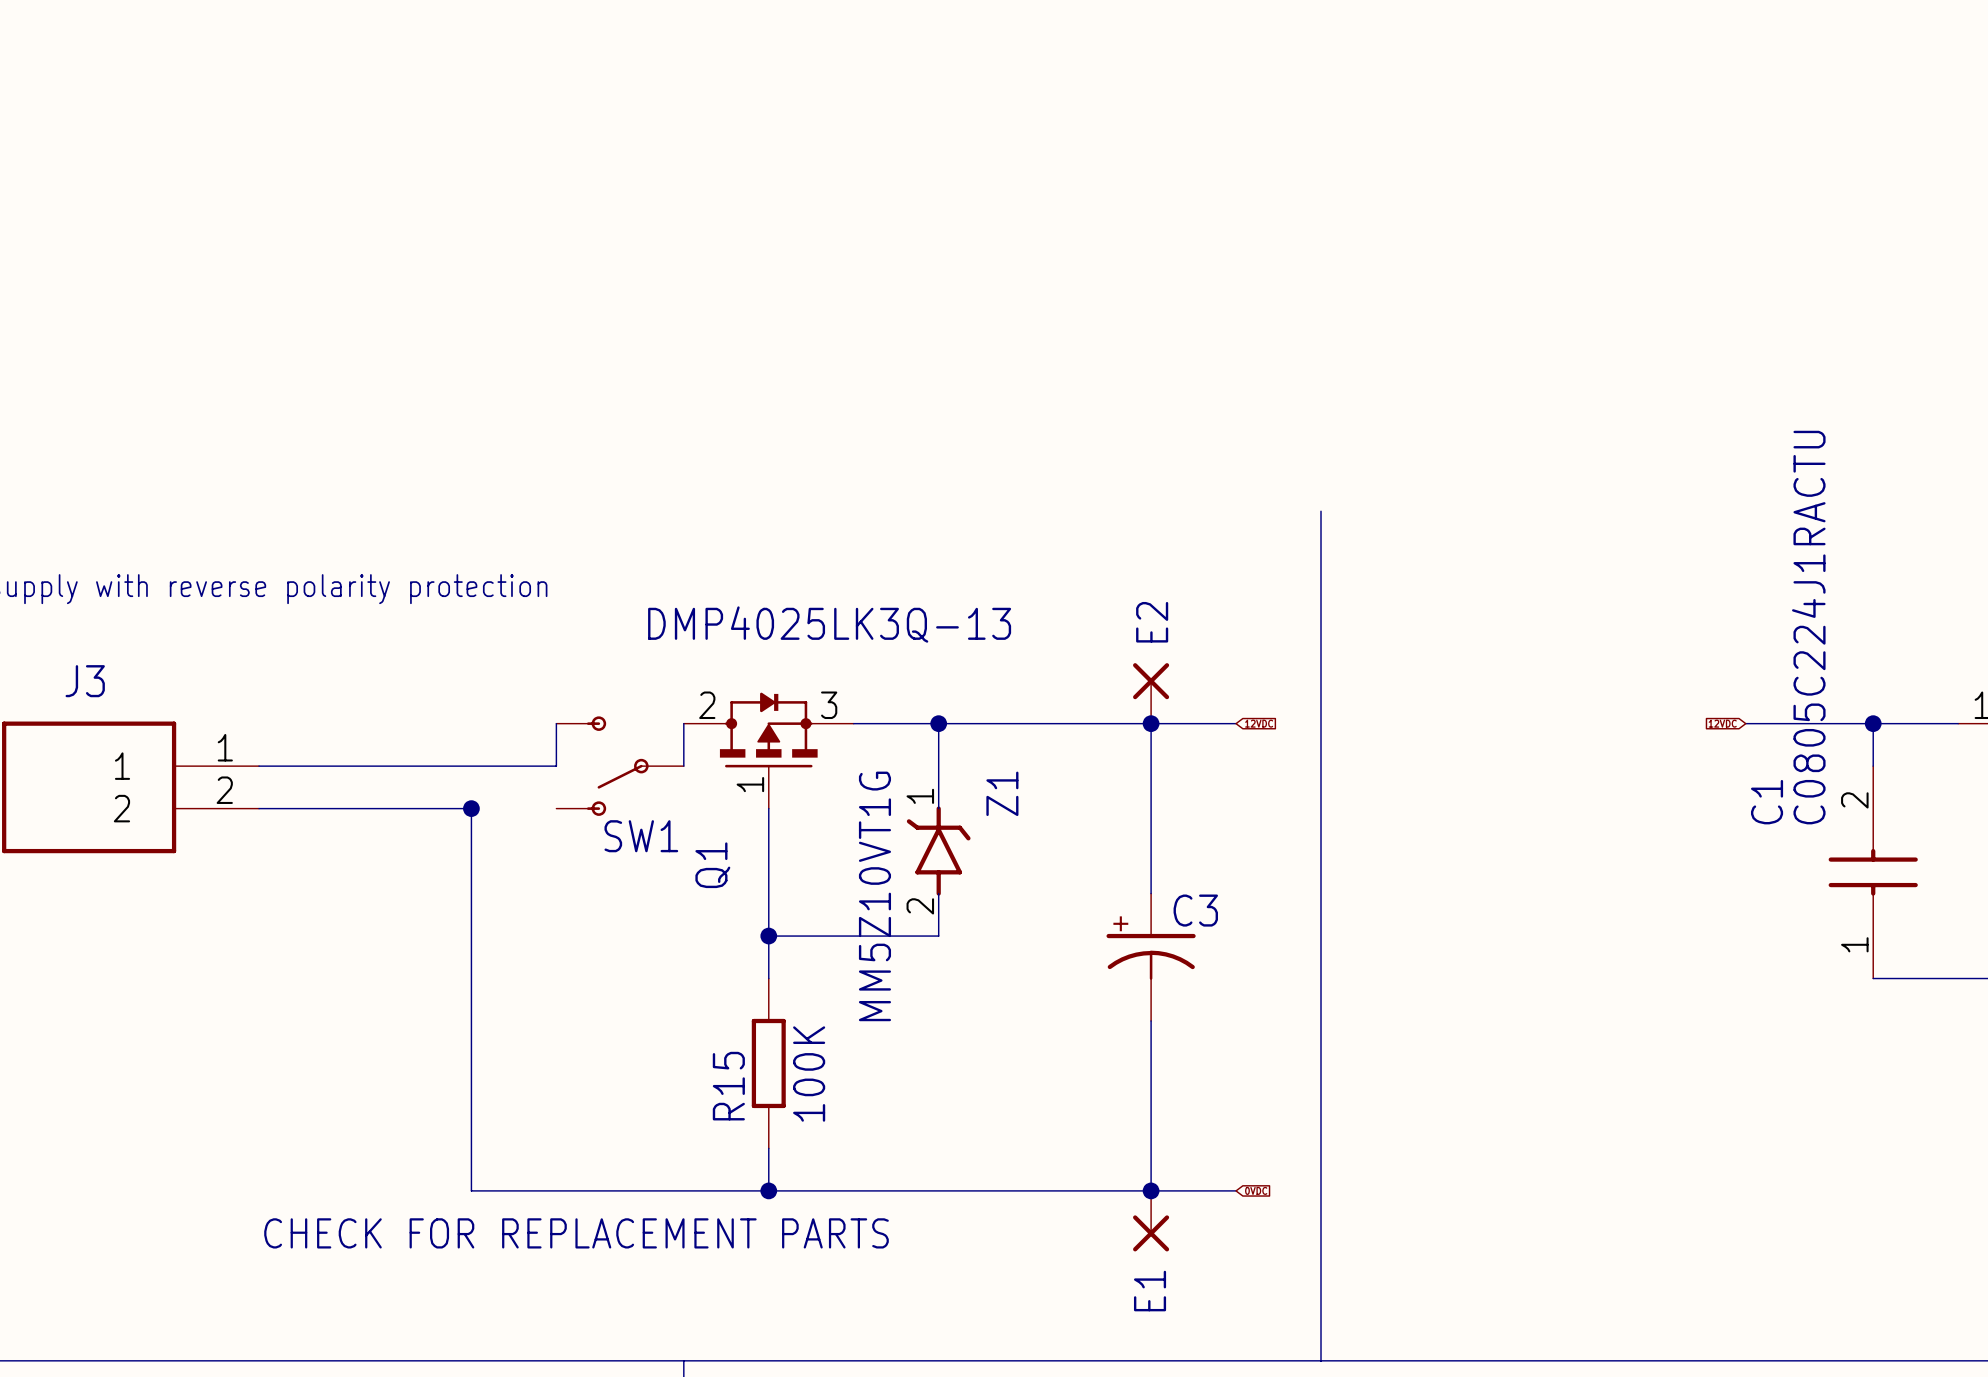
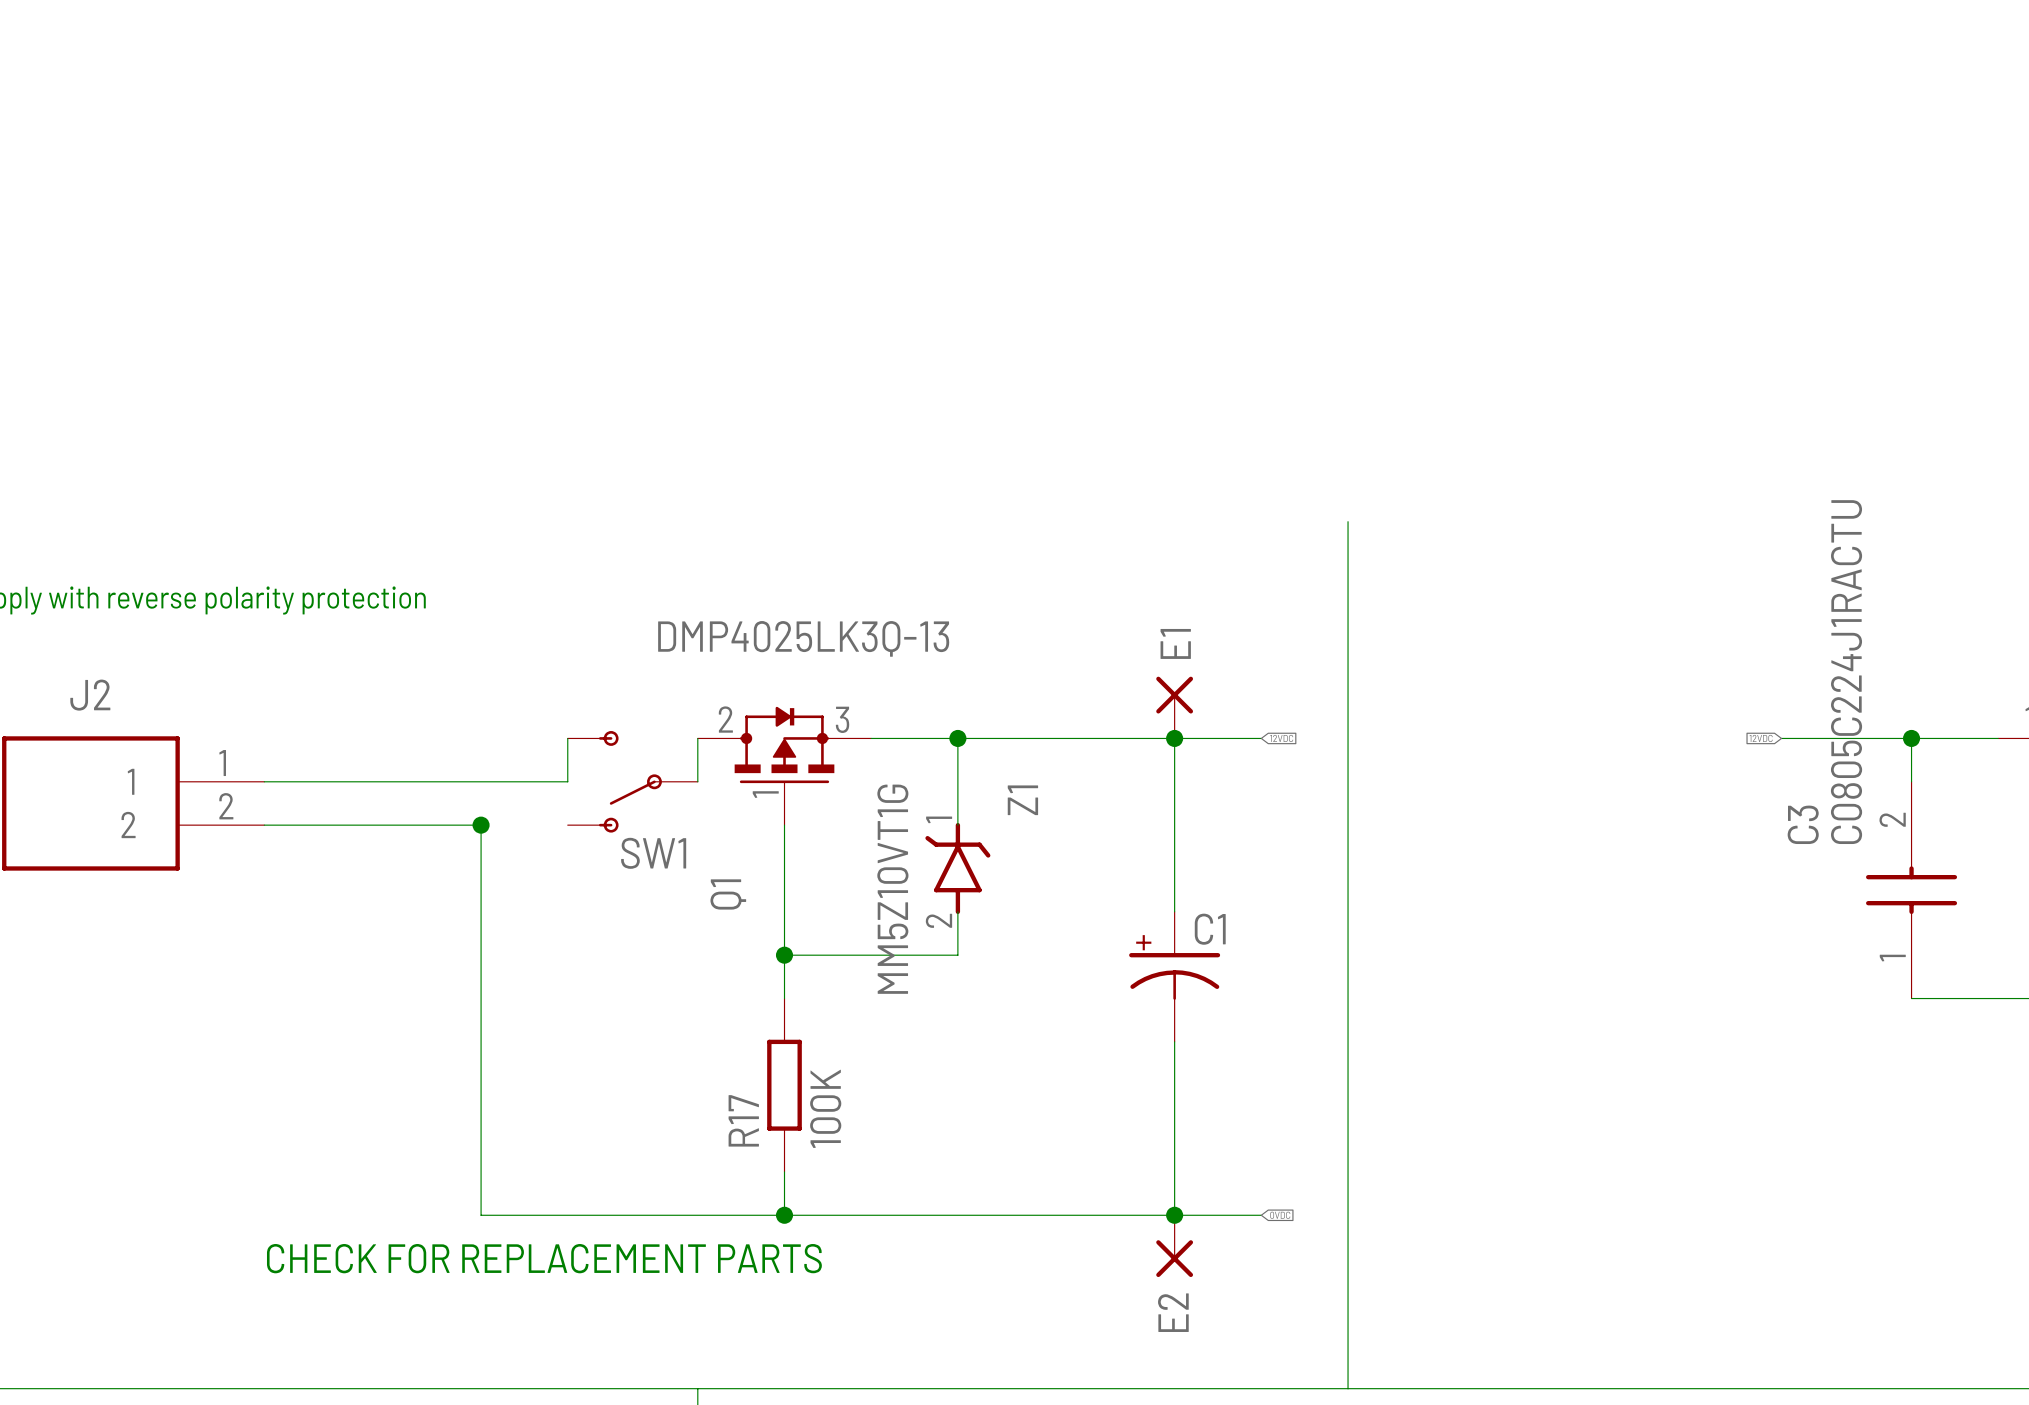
E2 name: E2 (1152, 622) -> E1 (1175, 643)
J3 name: J3 (85, 681) -> J2 (90, 695)
C1 name: C1 (1767, 802) -> C3 (1803, 824)
C3 name: C3 (1195, 910) -> C1 (1210, 929)
R15 name: R15 (728, 1086) -> R17 (743, 1120)
E1 name: E1 (1150, 1291) -> E2 (1173, 1312)

